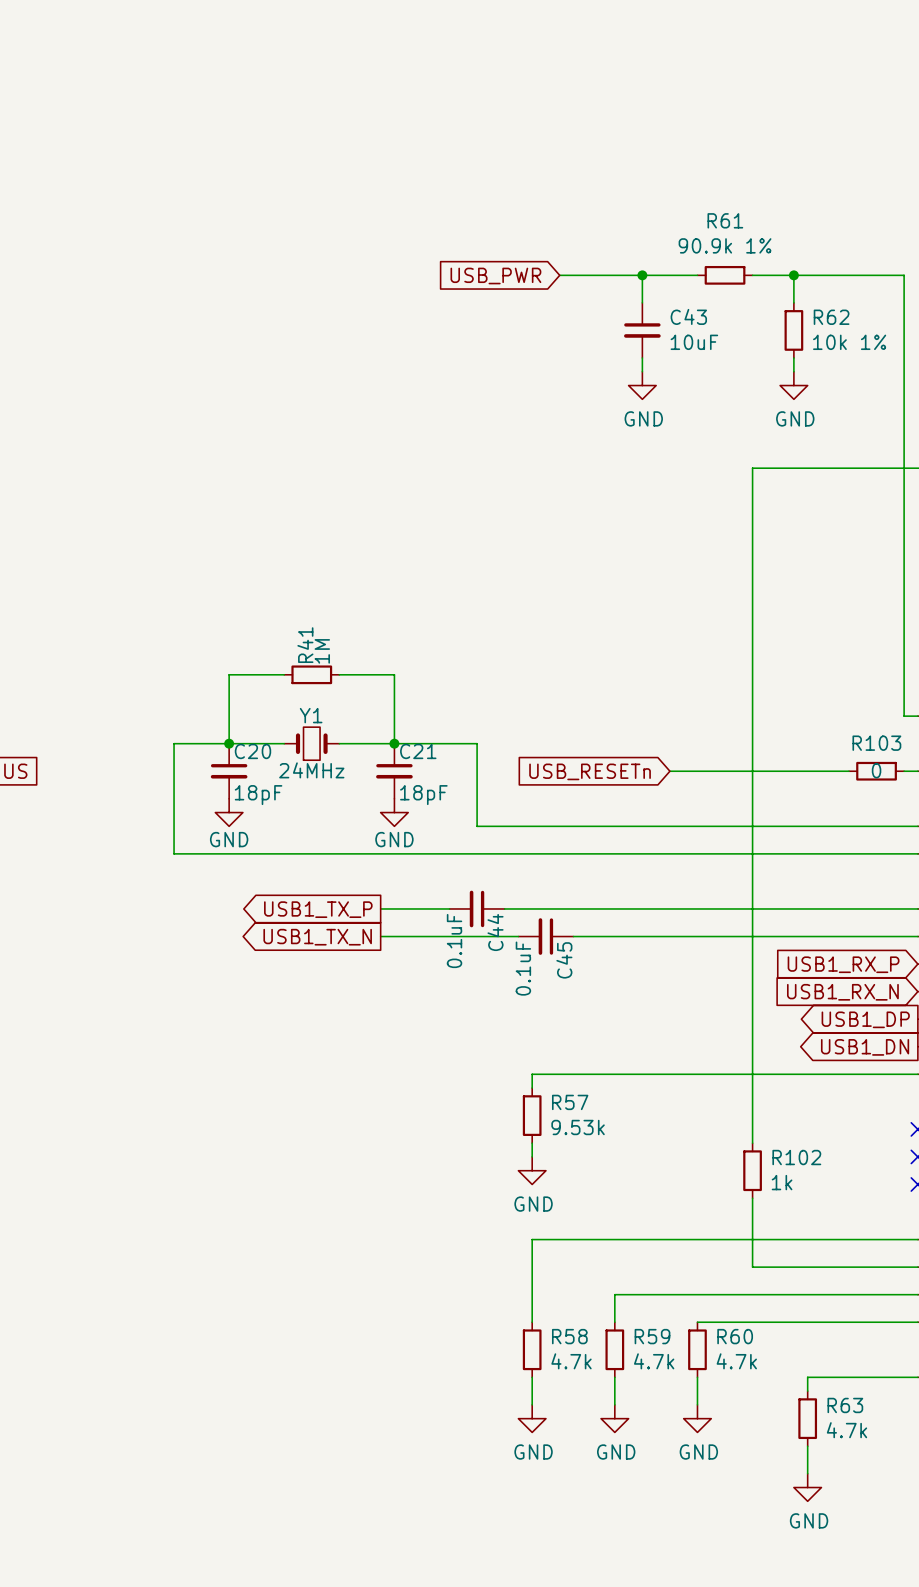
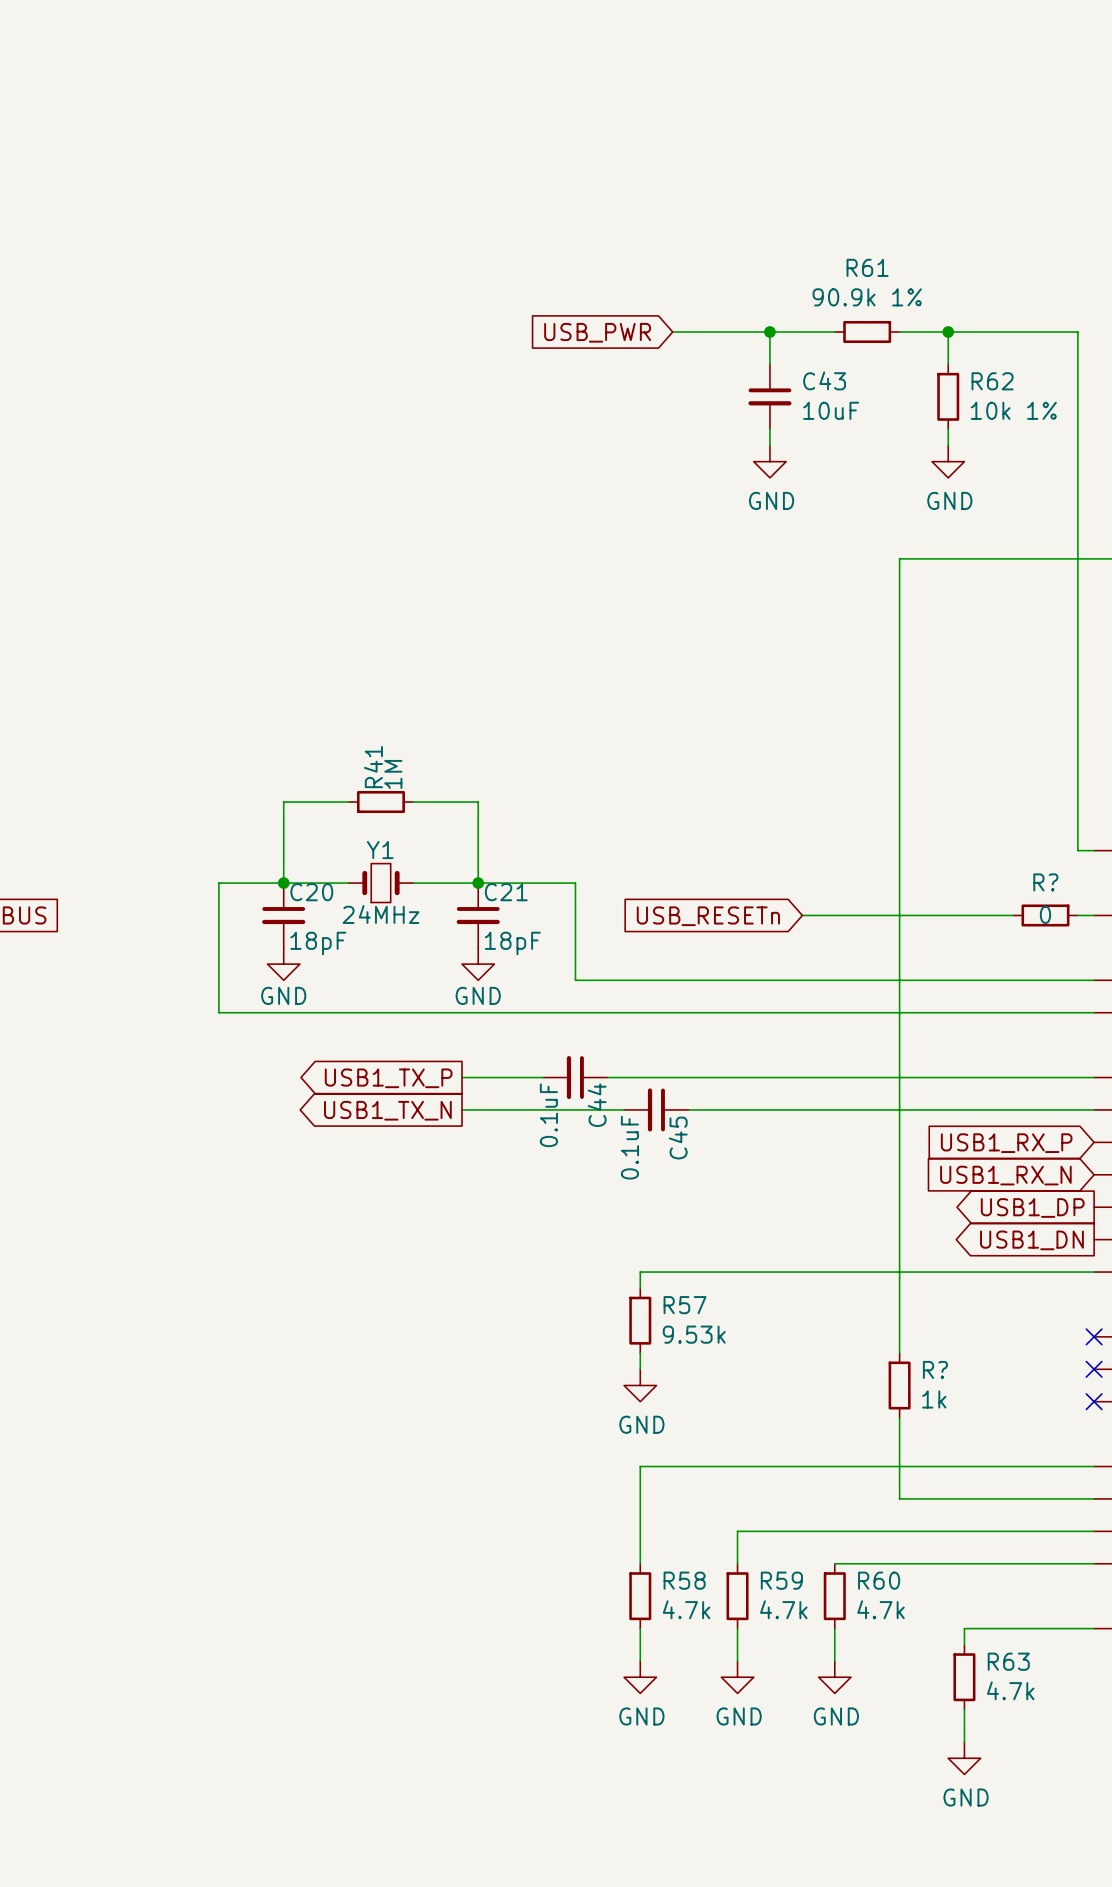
R103 name: R103 (876, 743) -> R? (1045, 882)
R102 name: R102 (796, 1157) -> R? (935, 1369)

